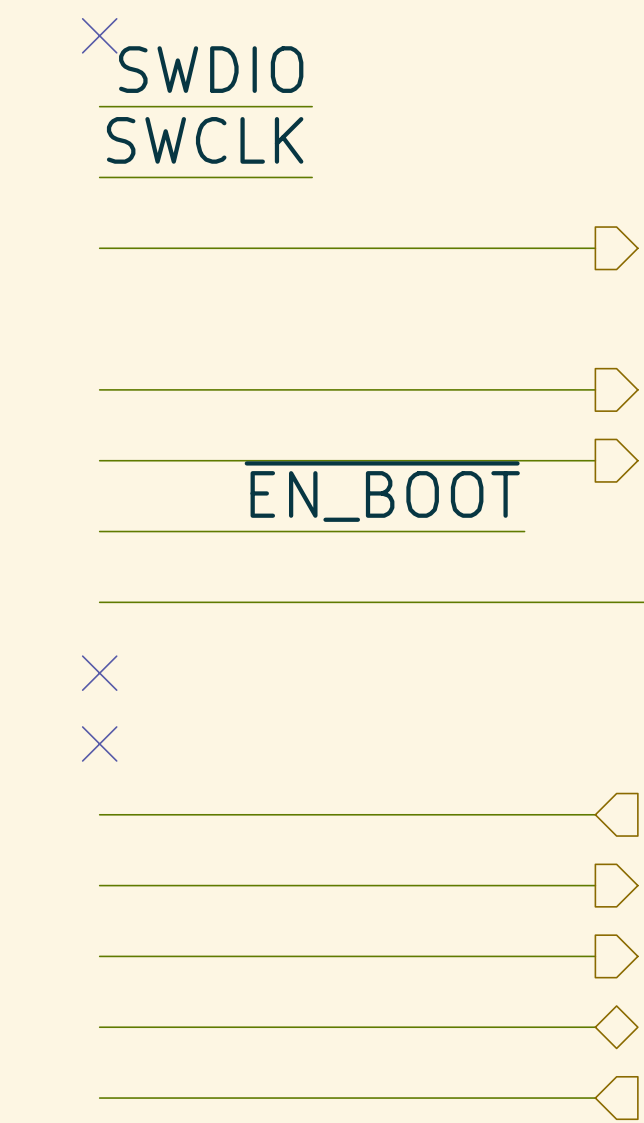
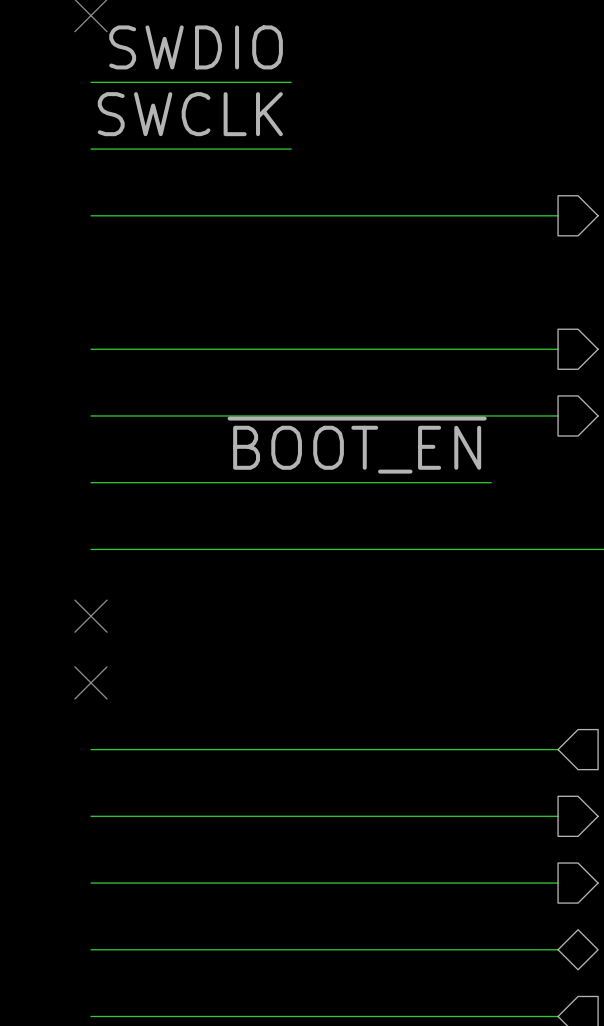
label: ~{EN_BOOT} (382, 491) -> ~{BOOT_EN} (357, 445)

